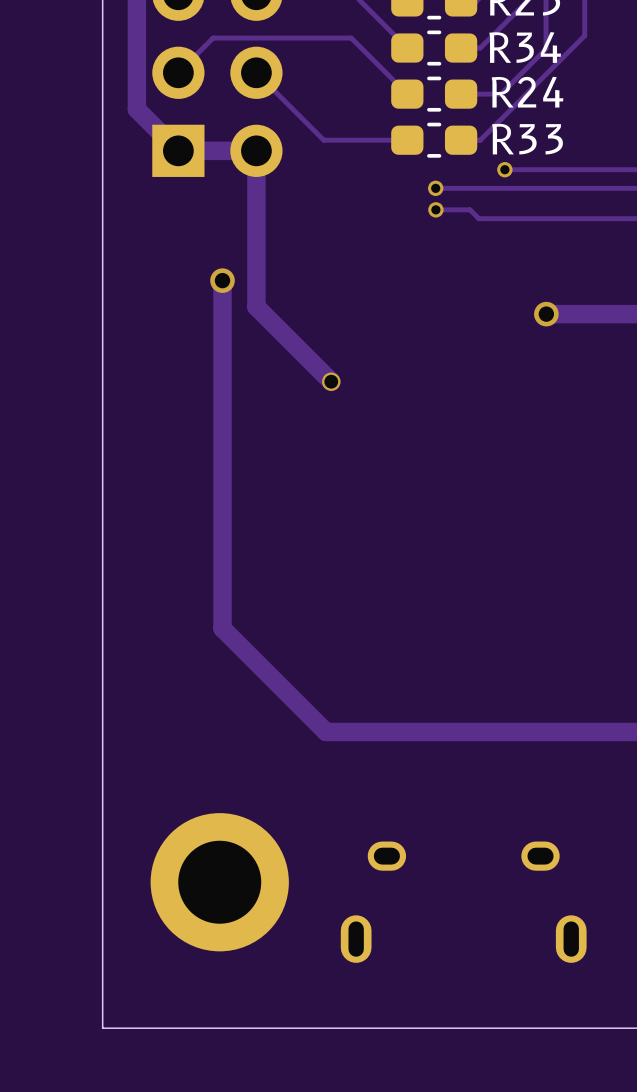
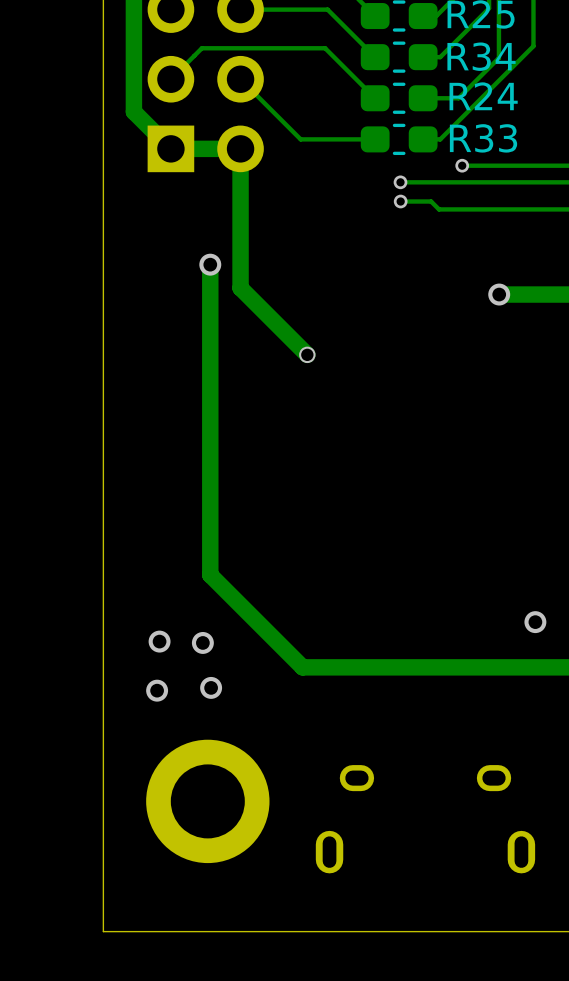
via: none -> (535, 622)
via: none -> (159, 641)
via: none -> (202, 642)
via: none -> (211, 687)
via: none -> (157, 690)

